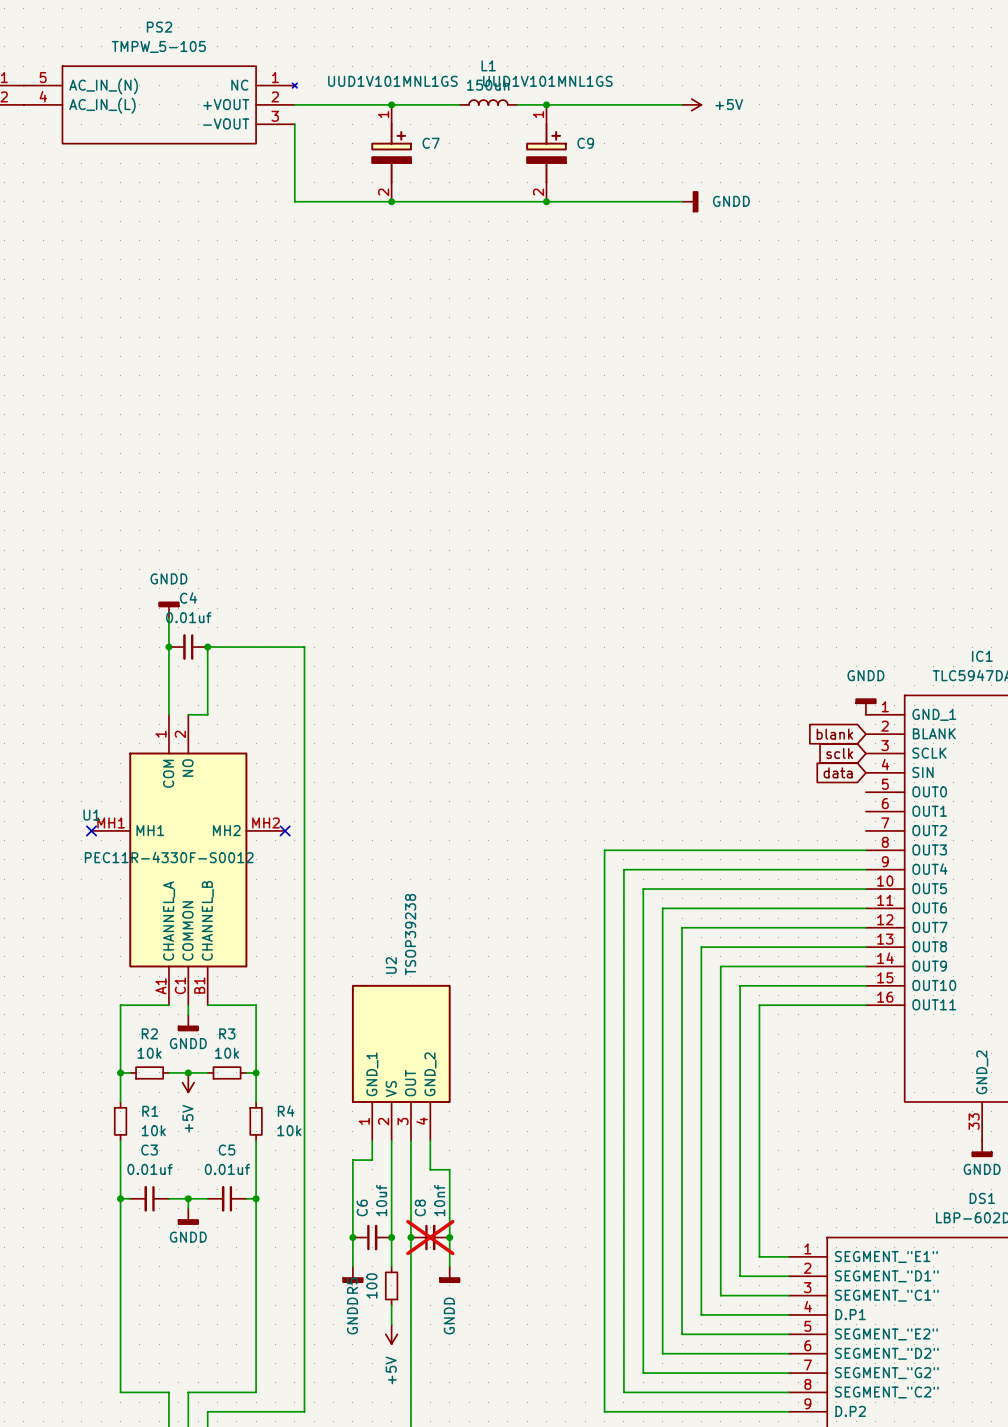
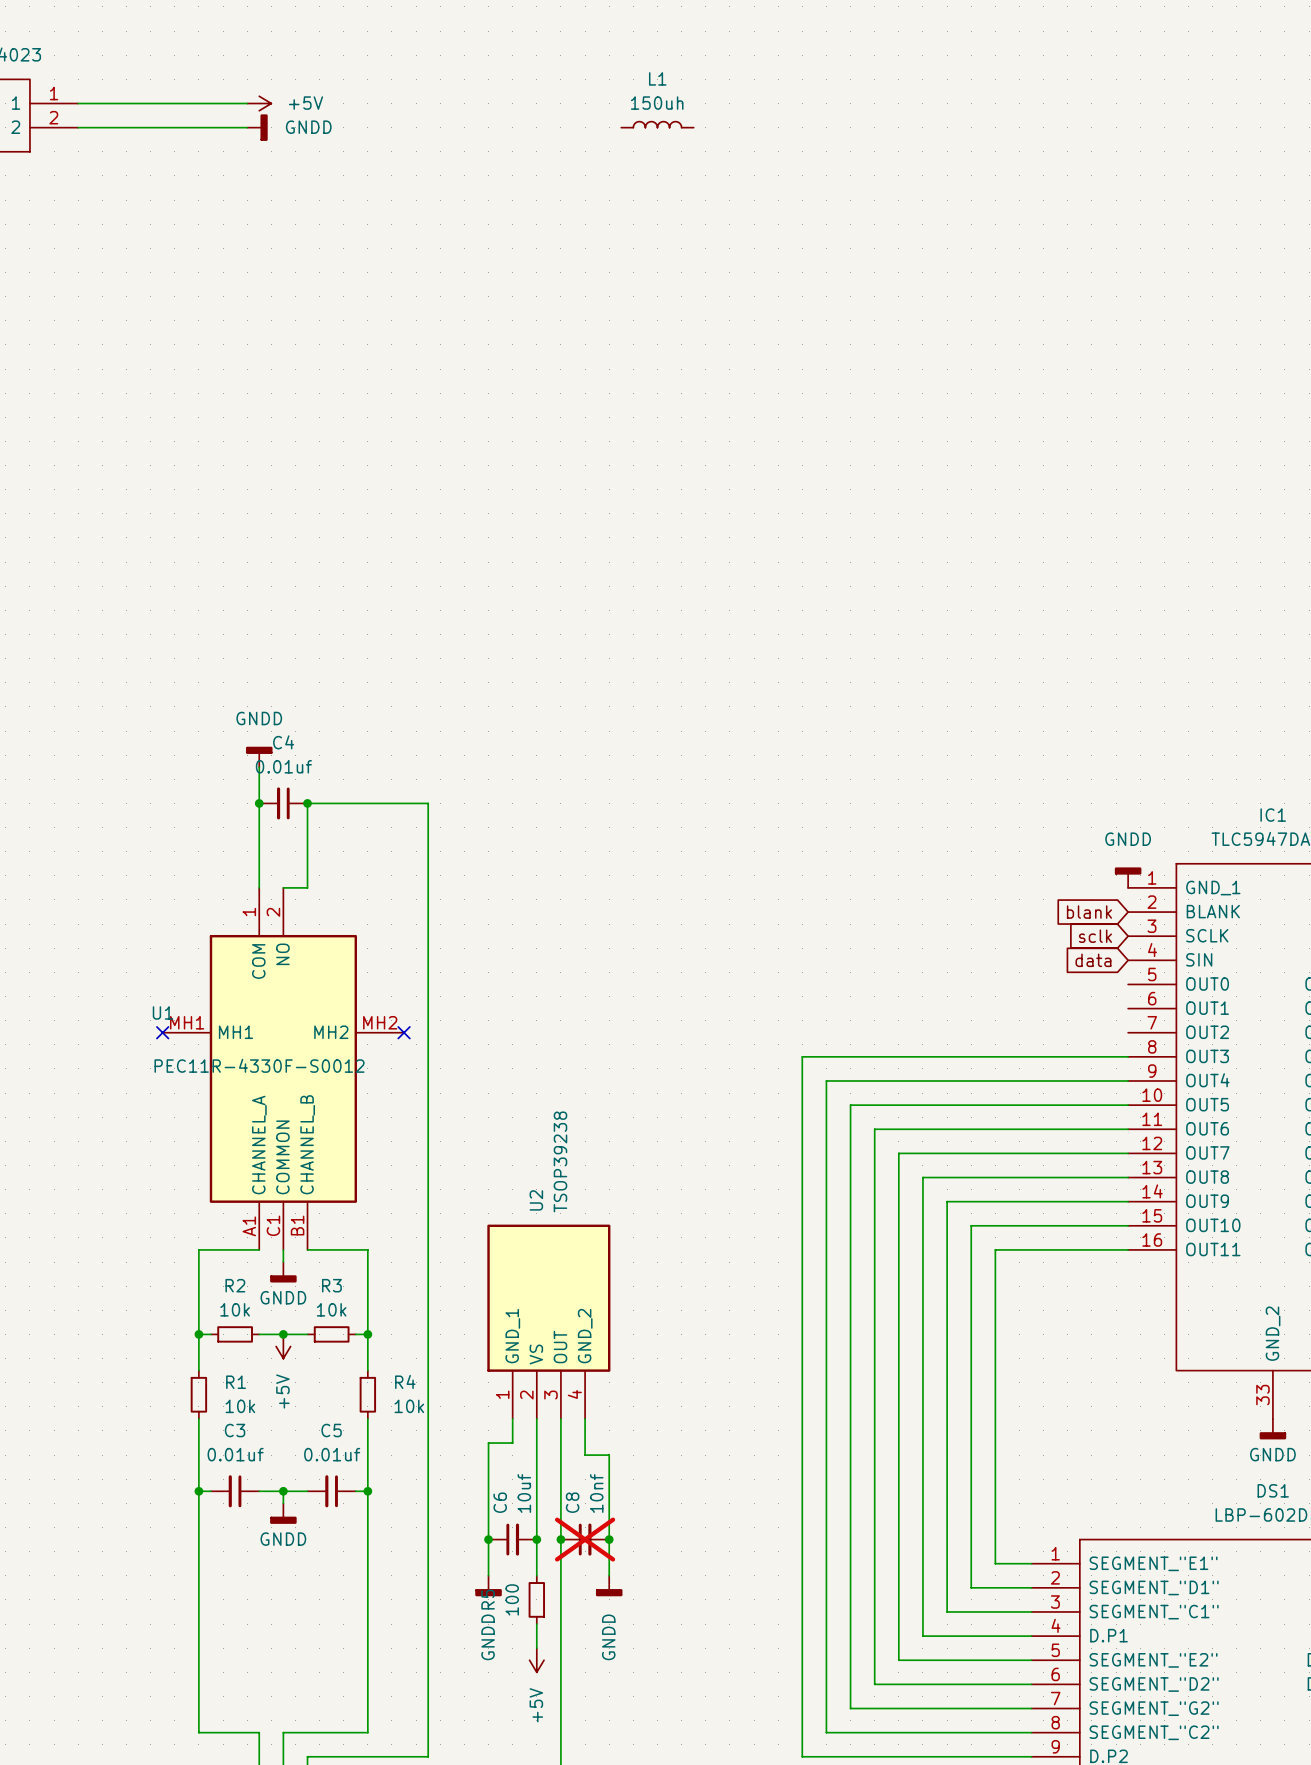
wire: none -> (78, 103) (247, 103)
power symbol: none -> +5V (259, 103)
wire: none -> (78, 127) (247, 127)
PS2: TMPW_5-105 (160, 104) -> none
power symbol: none -> GNDD (257, 127)
wire: (294, 104) (459, 104) -> none
junction: (391, 104) -> none
wire: (517, 104) (682, 104) -> none
junction: (546, 104) -> none
power symbol: +5V (691, 104) -> none
wire: (294, 124) (294, 201) (682, 201) -> none
C7: UUD1V101MNL1GS (391, 153) -> none
C9: UUD1V101MNL1GS (546, 153) -> none
junction: (391, 201) -> none
junction: (546, 201) -> none
power symbol: GNDD (690, 201) -> none

